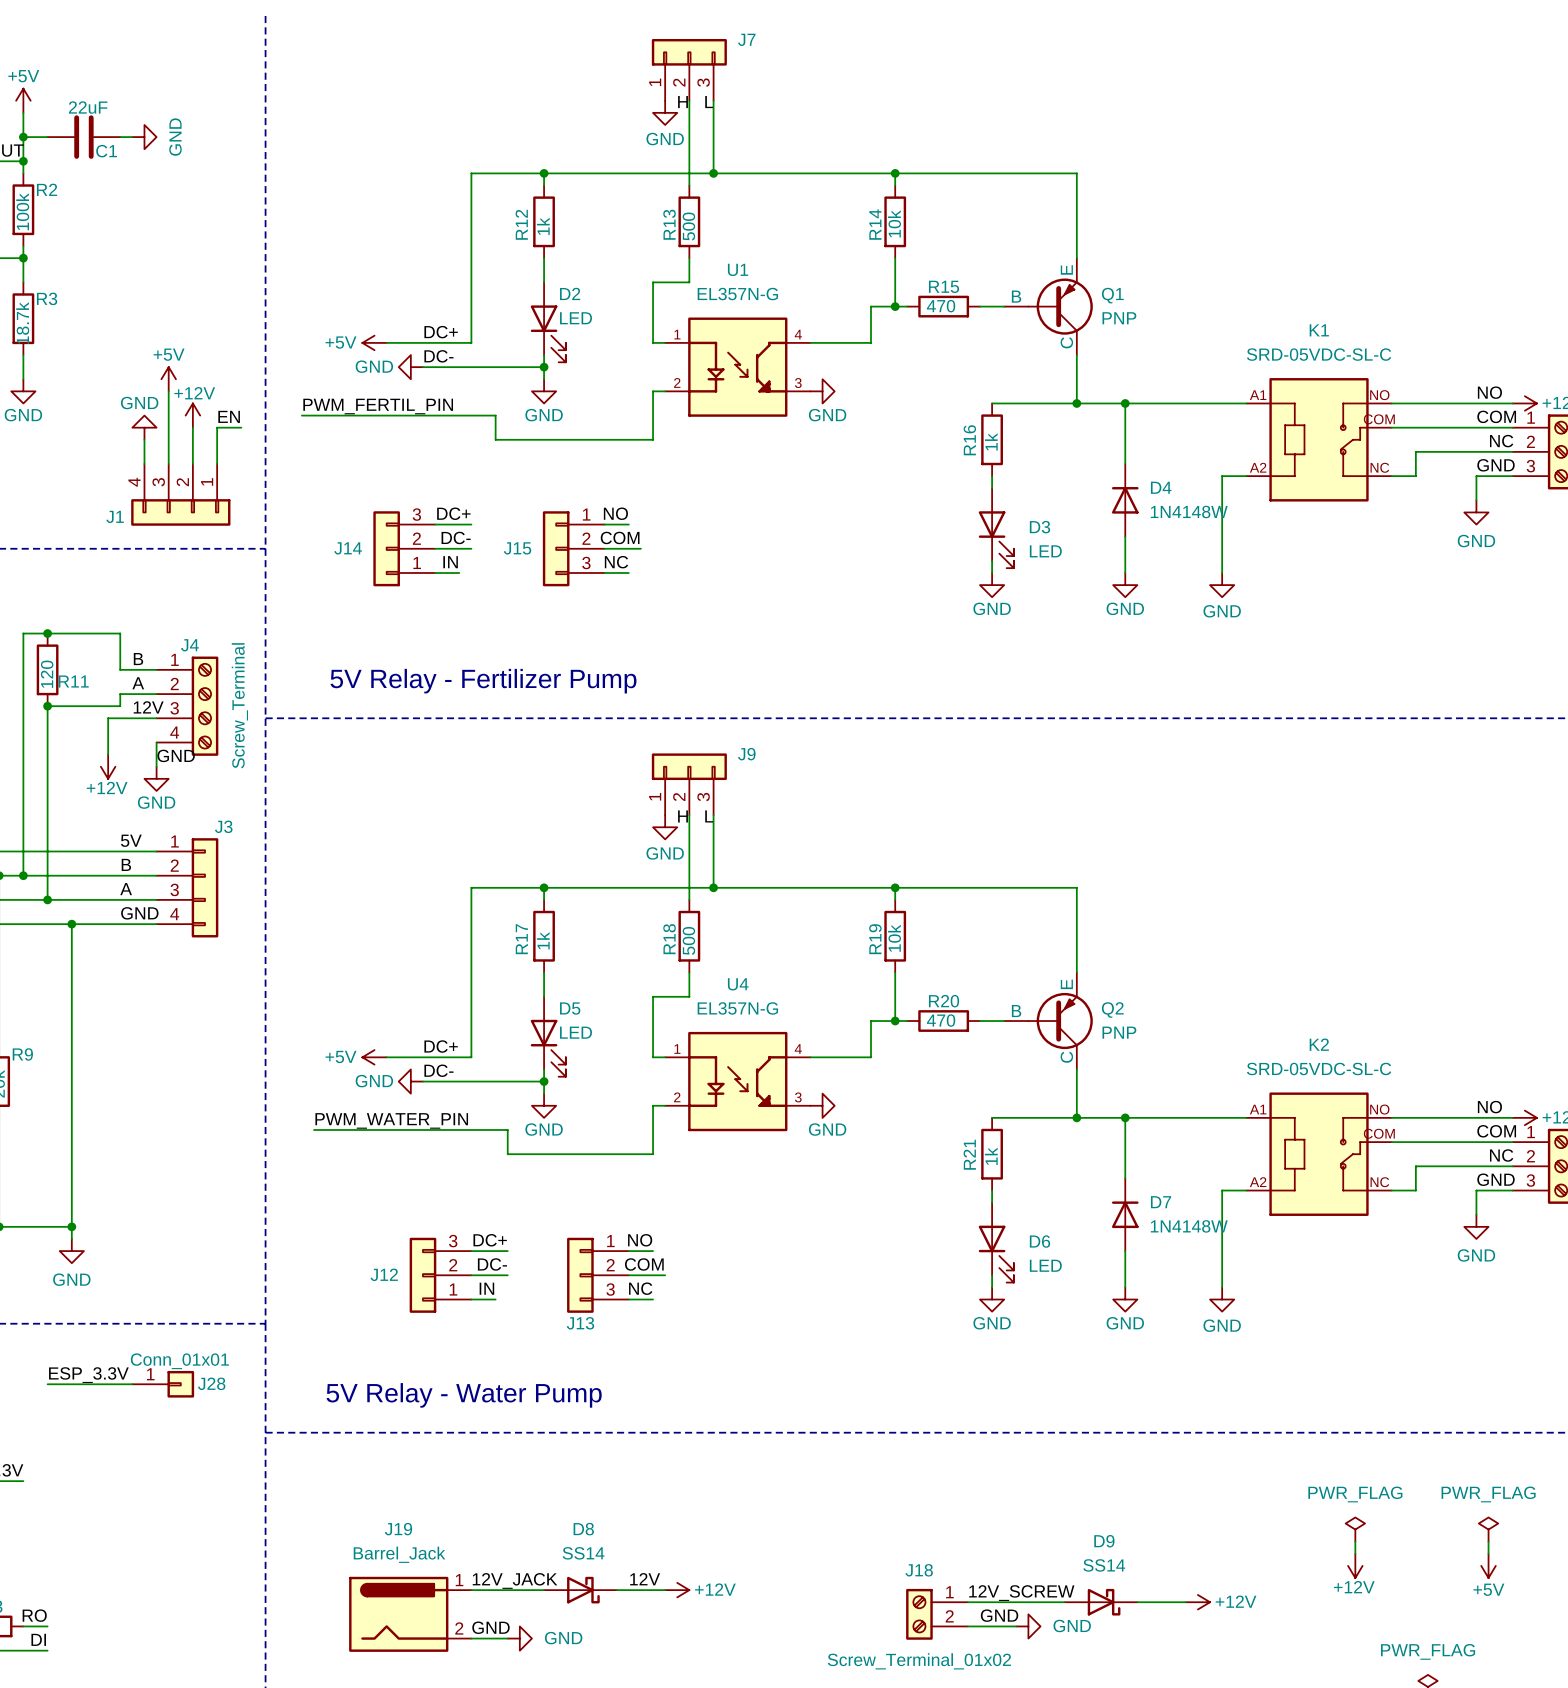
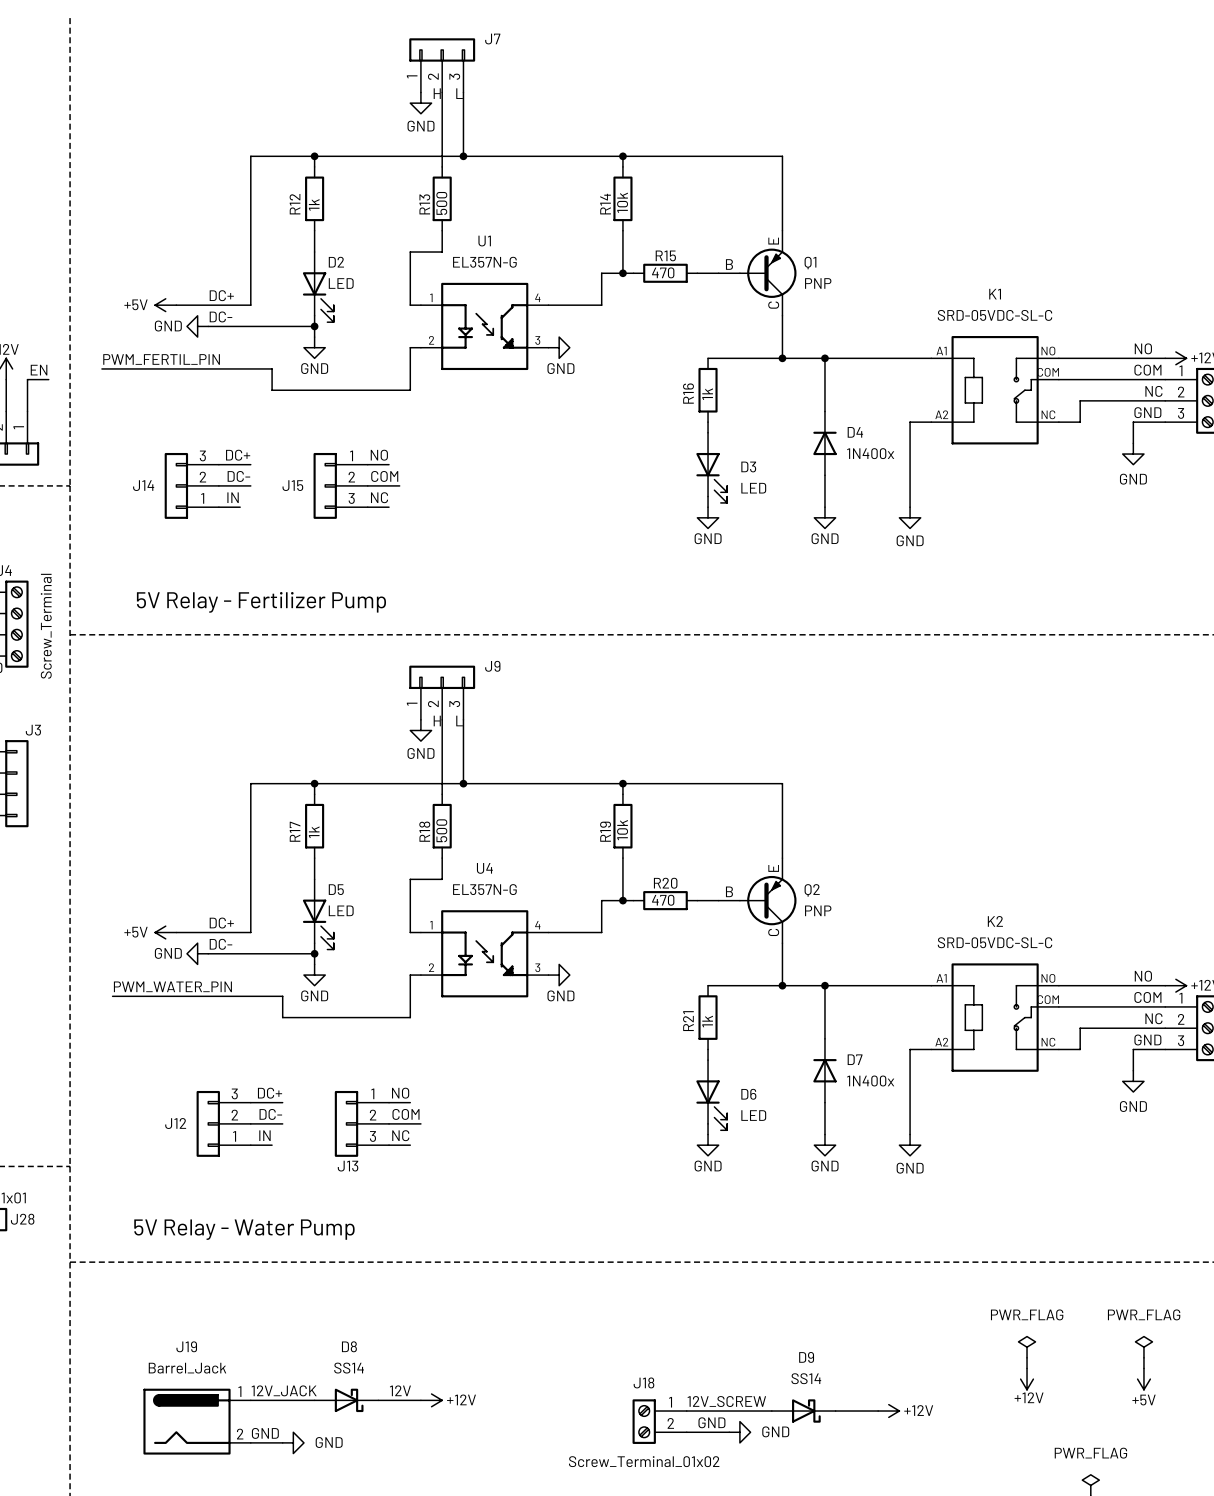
D4 value: 1N4148W (1189, 511) -> 1N400x (870, 453)
D7 value: 1N4148W (1189, 1226) -> 1N400x (870, 1080)

